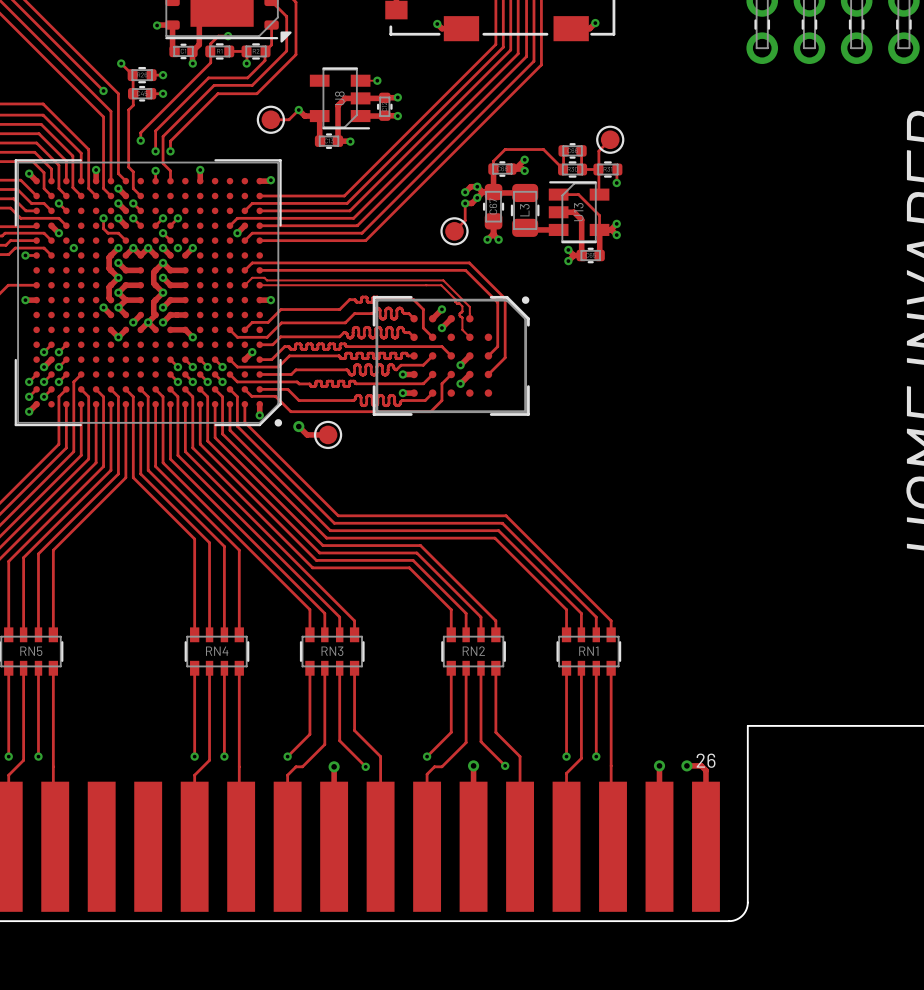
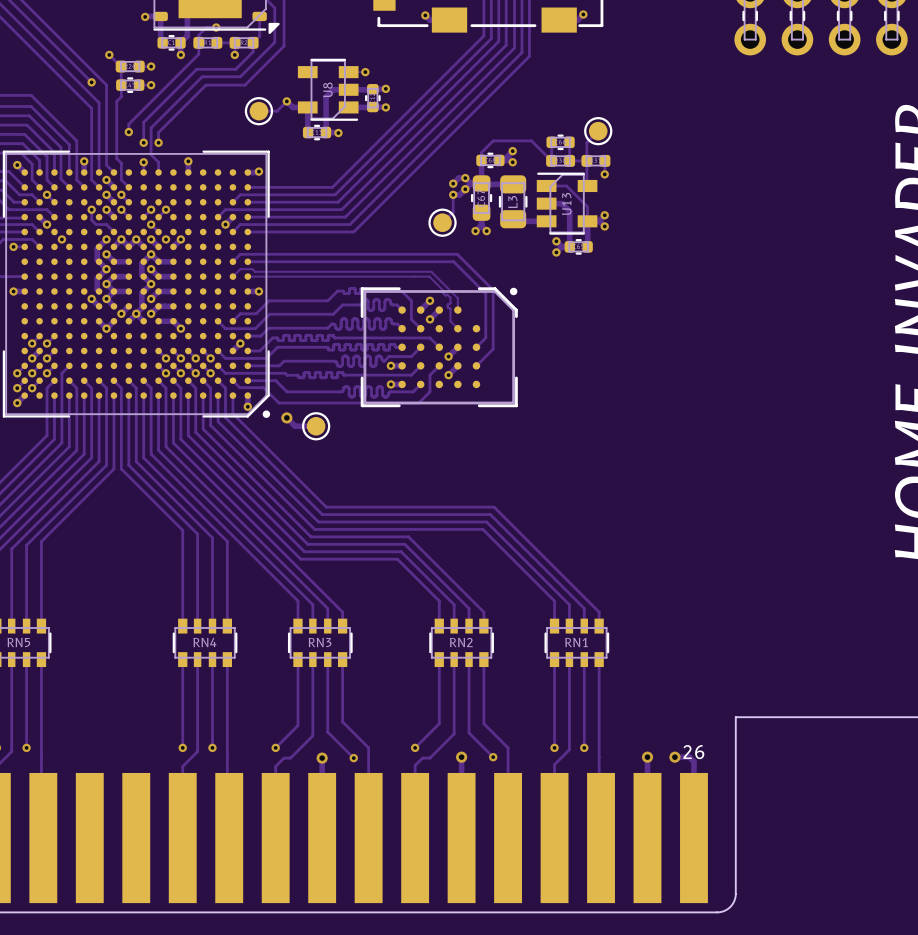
part footprint: [205, 43, 235, 60] -> [193, 36, 223, 49]
part footprint: [241, 43, 271, 60] -> [229, 36, 259, 49]
part footprint: [127, 66, 157, 84] -> [115, 60, 145, 73]
part footprint: [558, 161, 588, 178] -> [546, 154, 576, 167]
part footprint: [593, 161, 623, 178] -> [581, 154, 611, 167]

